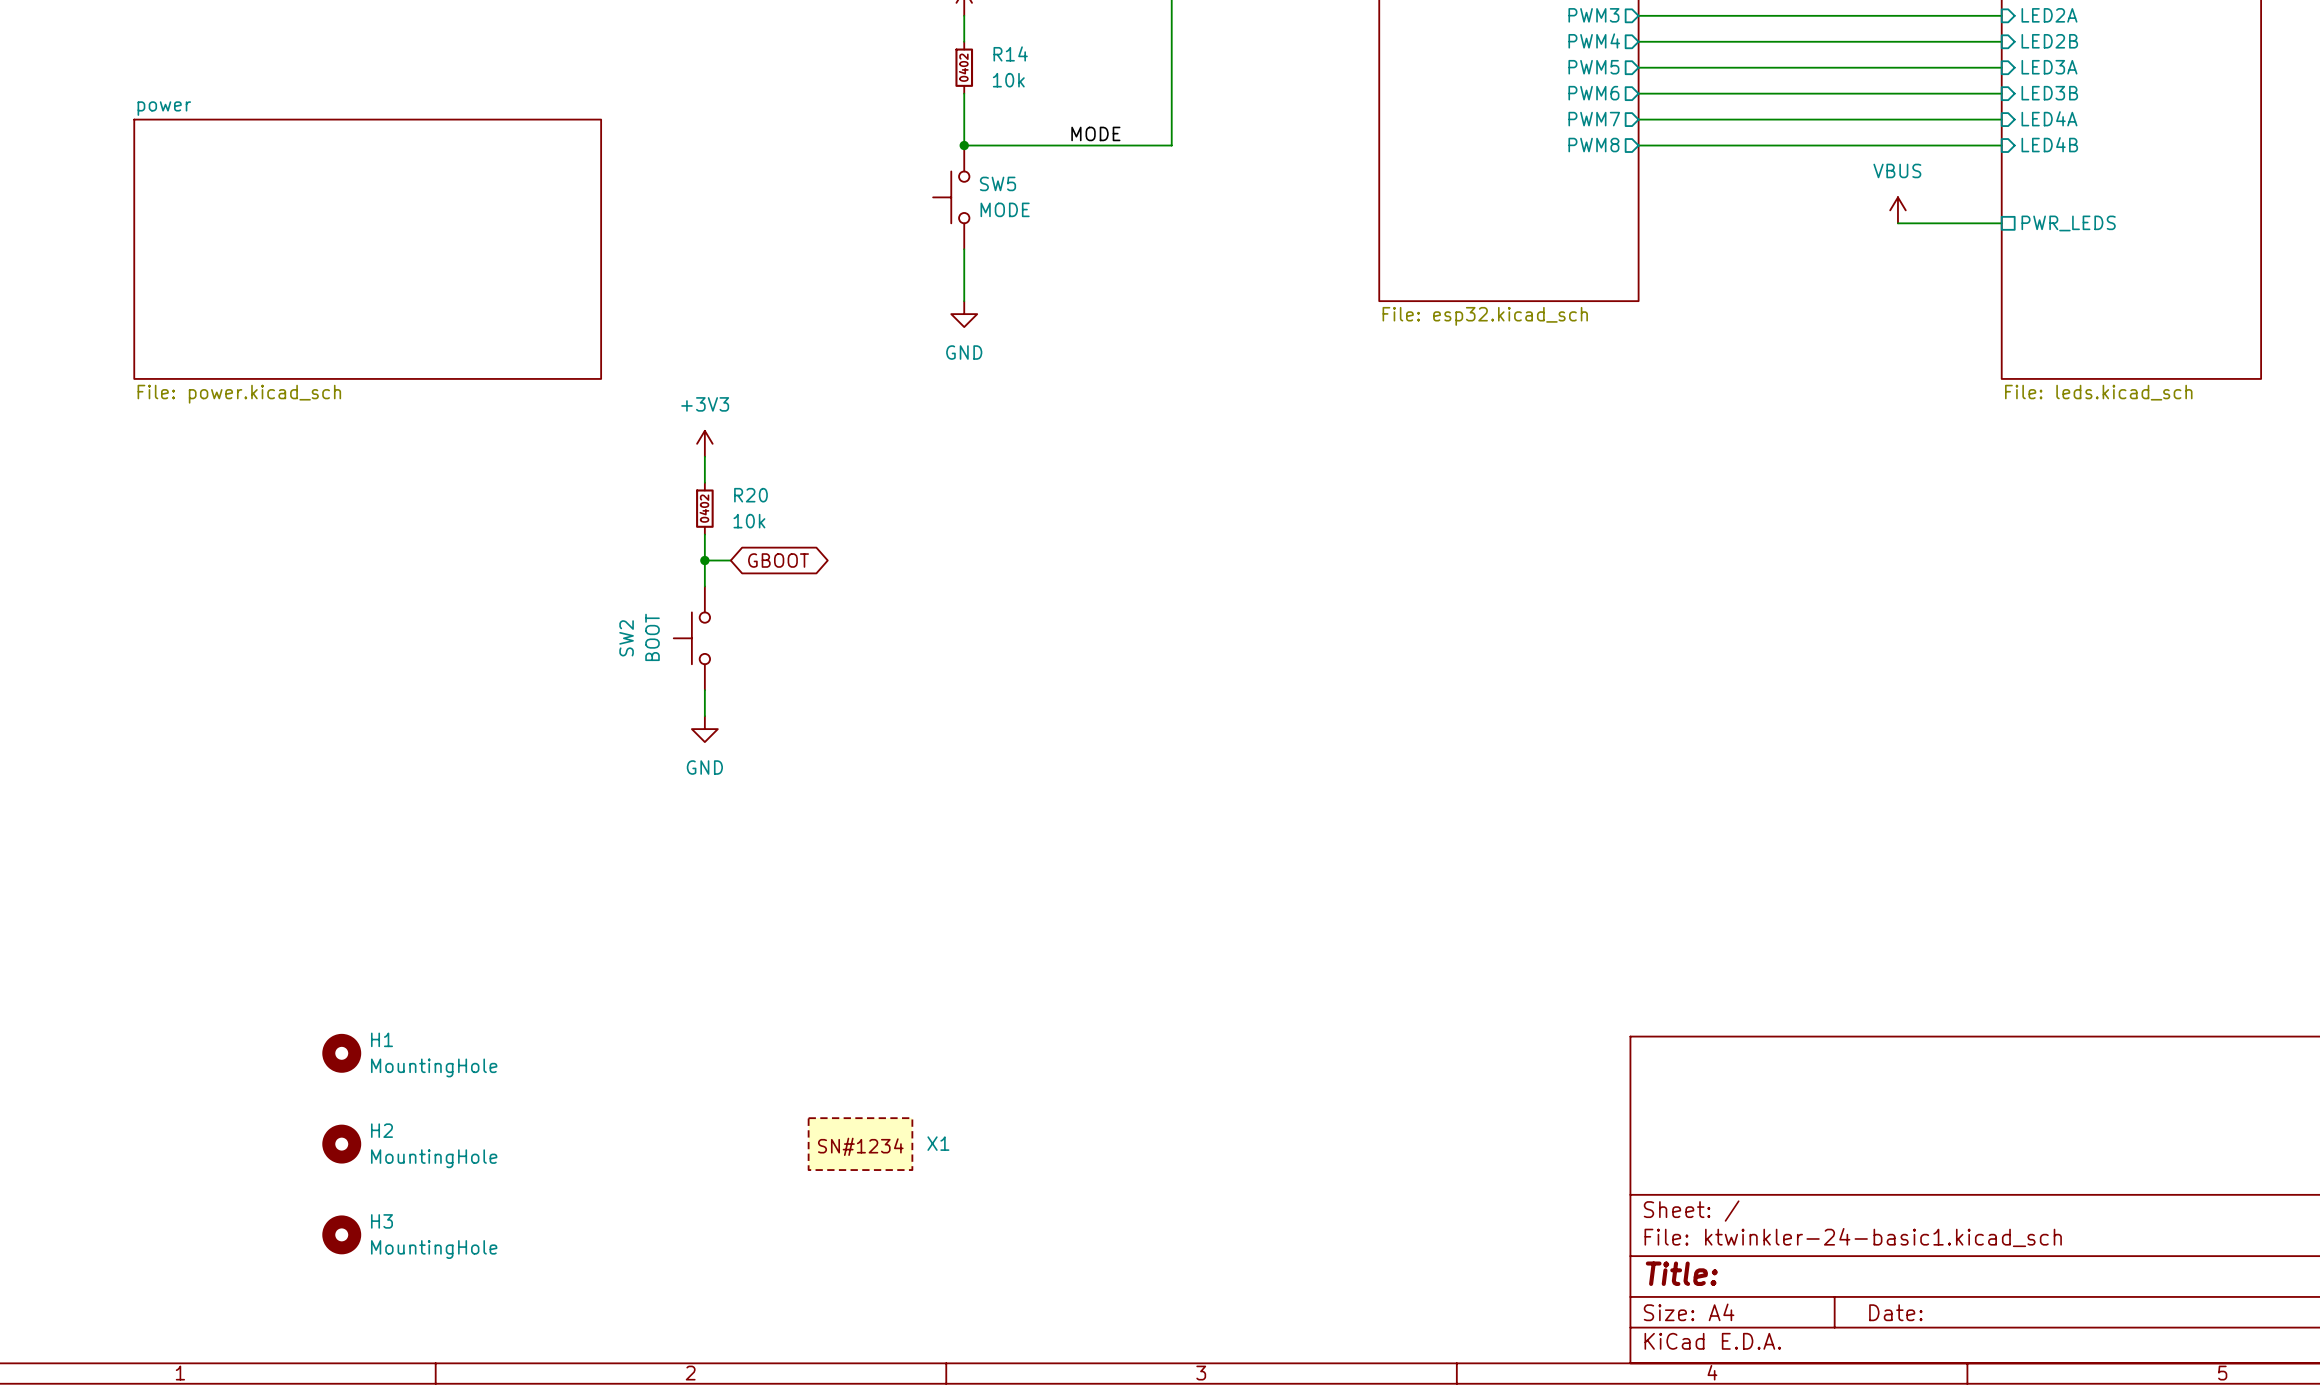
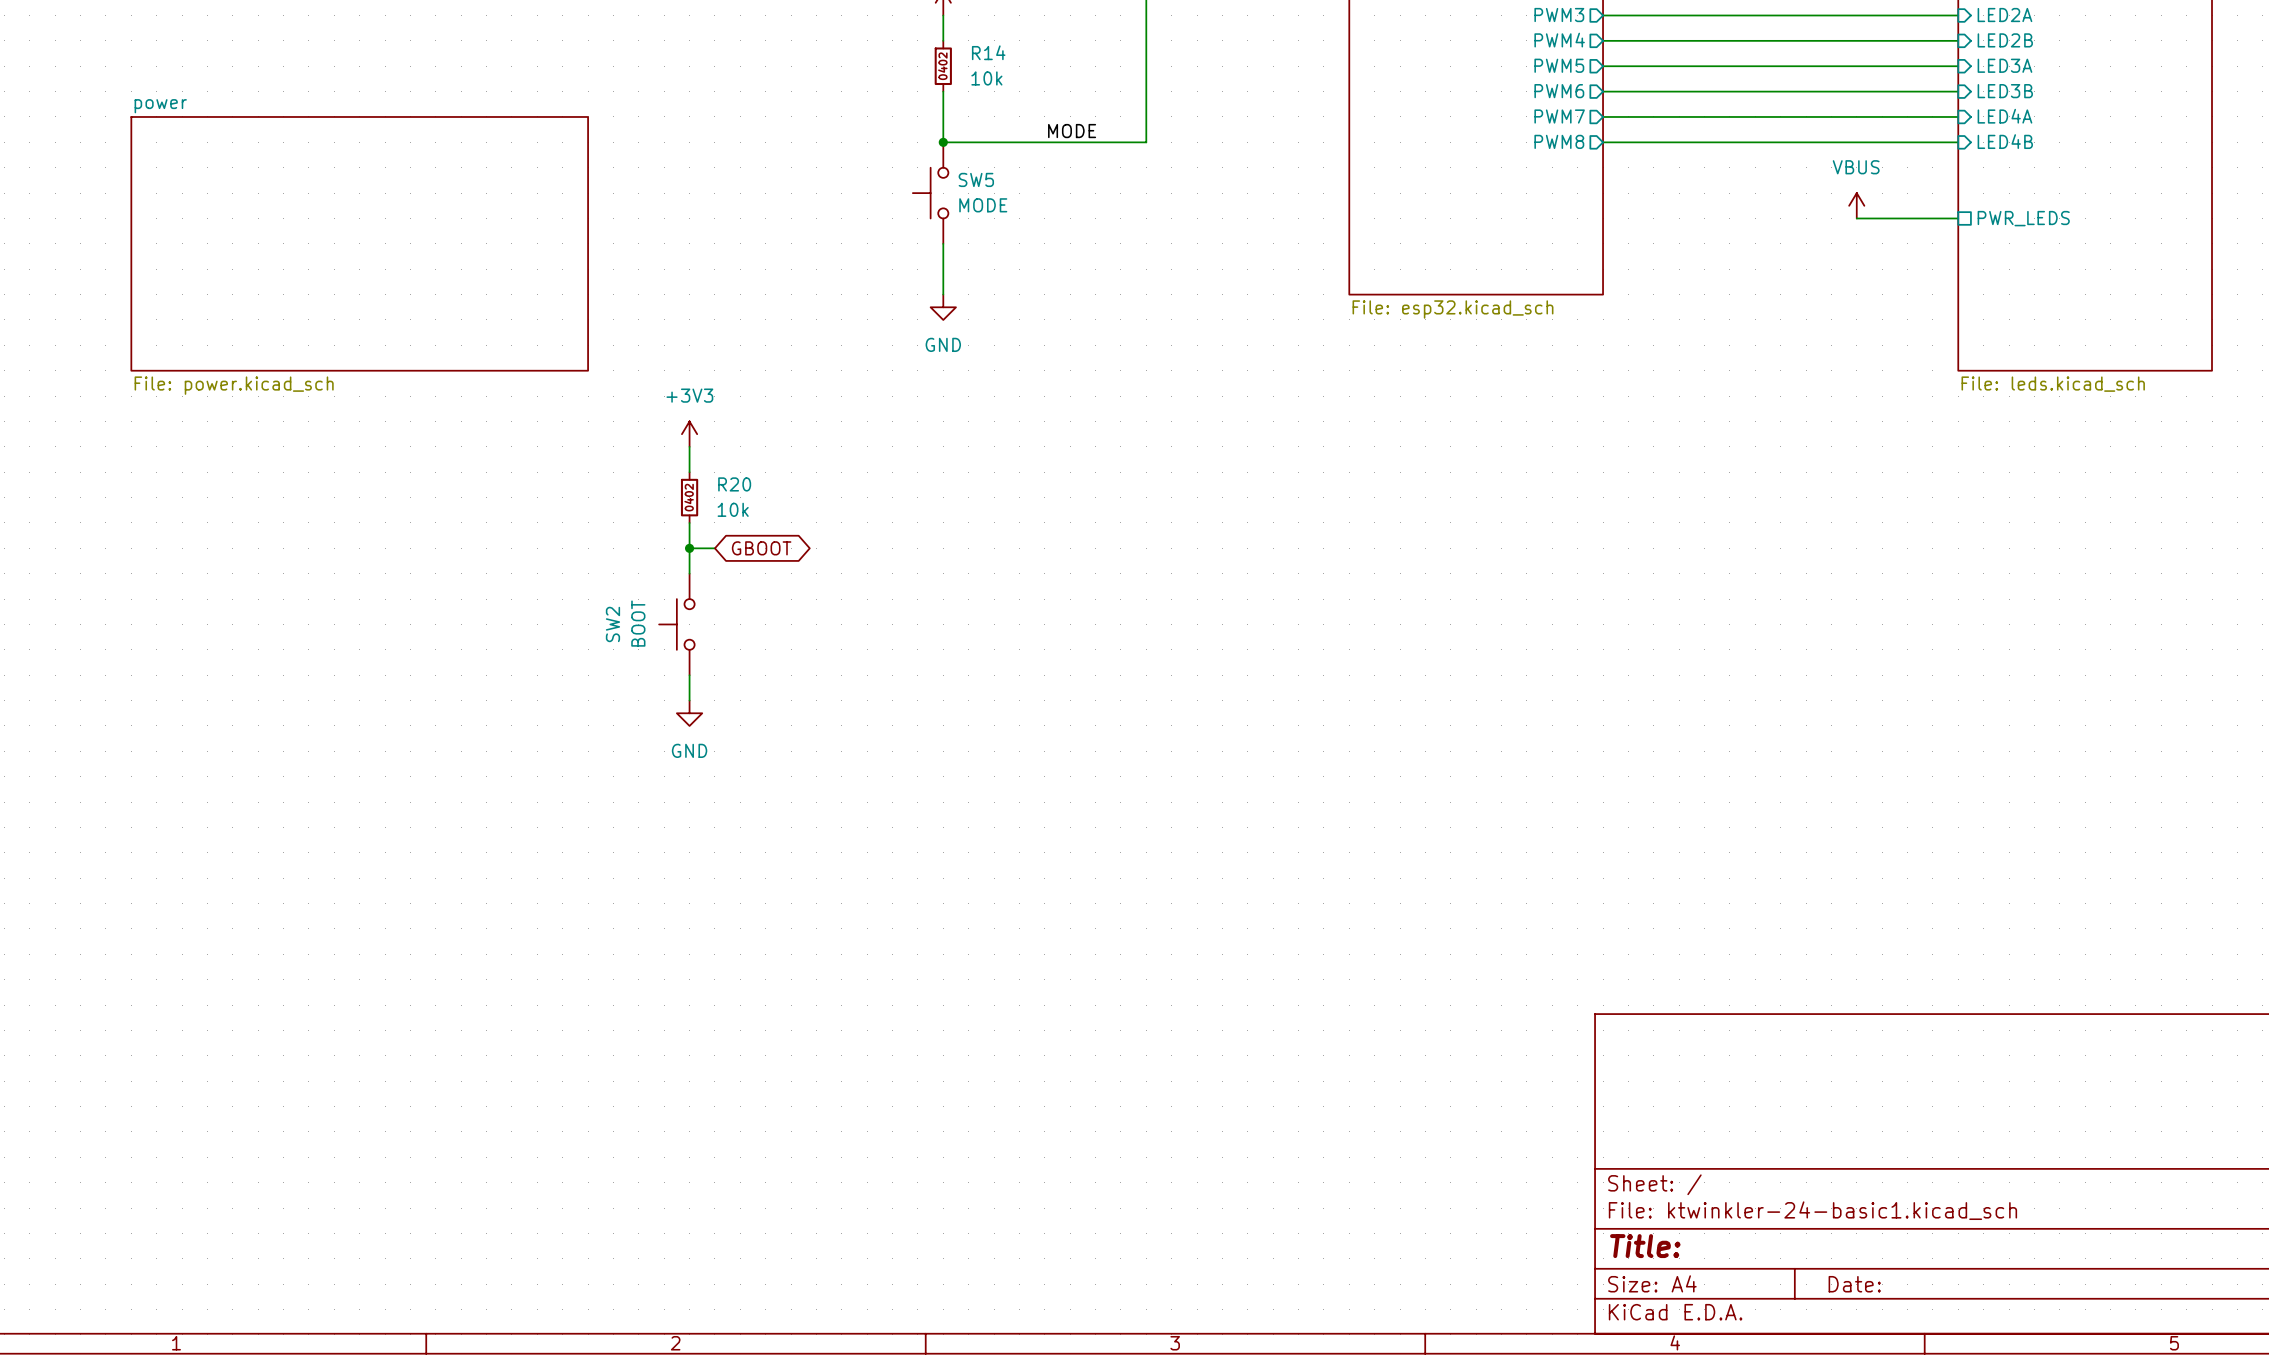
H1: MountingHole (341, 1053) -> none
H2: MountingHole (341, 1144) -> none
X1: (860, 1144) -> none
H3: MountingHole (341, 1234) -> none

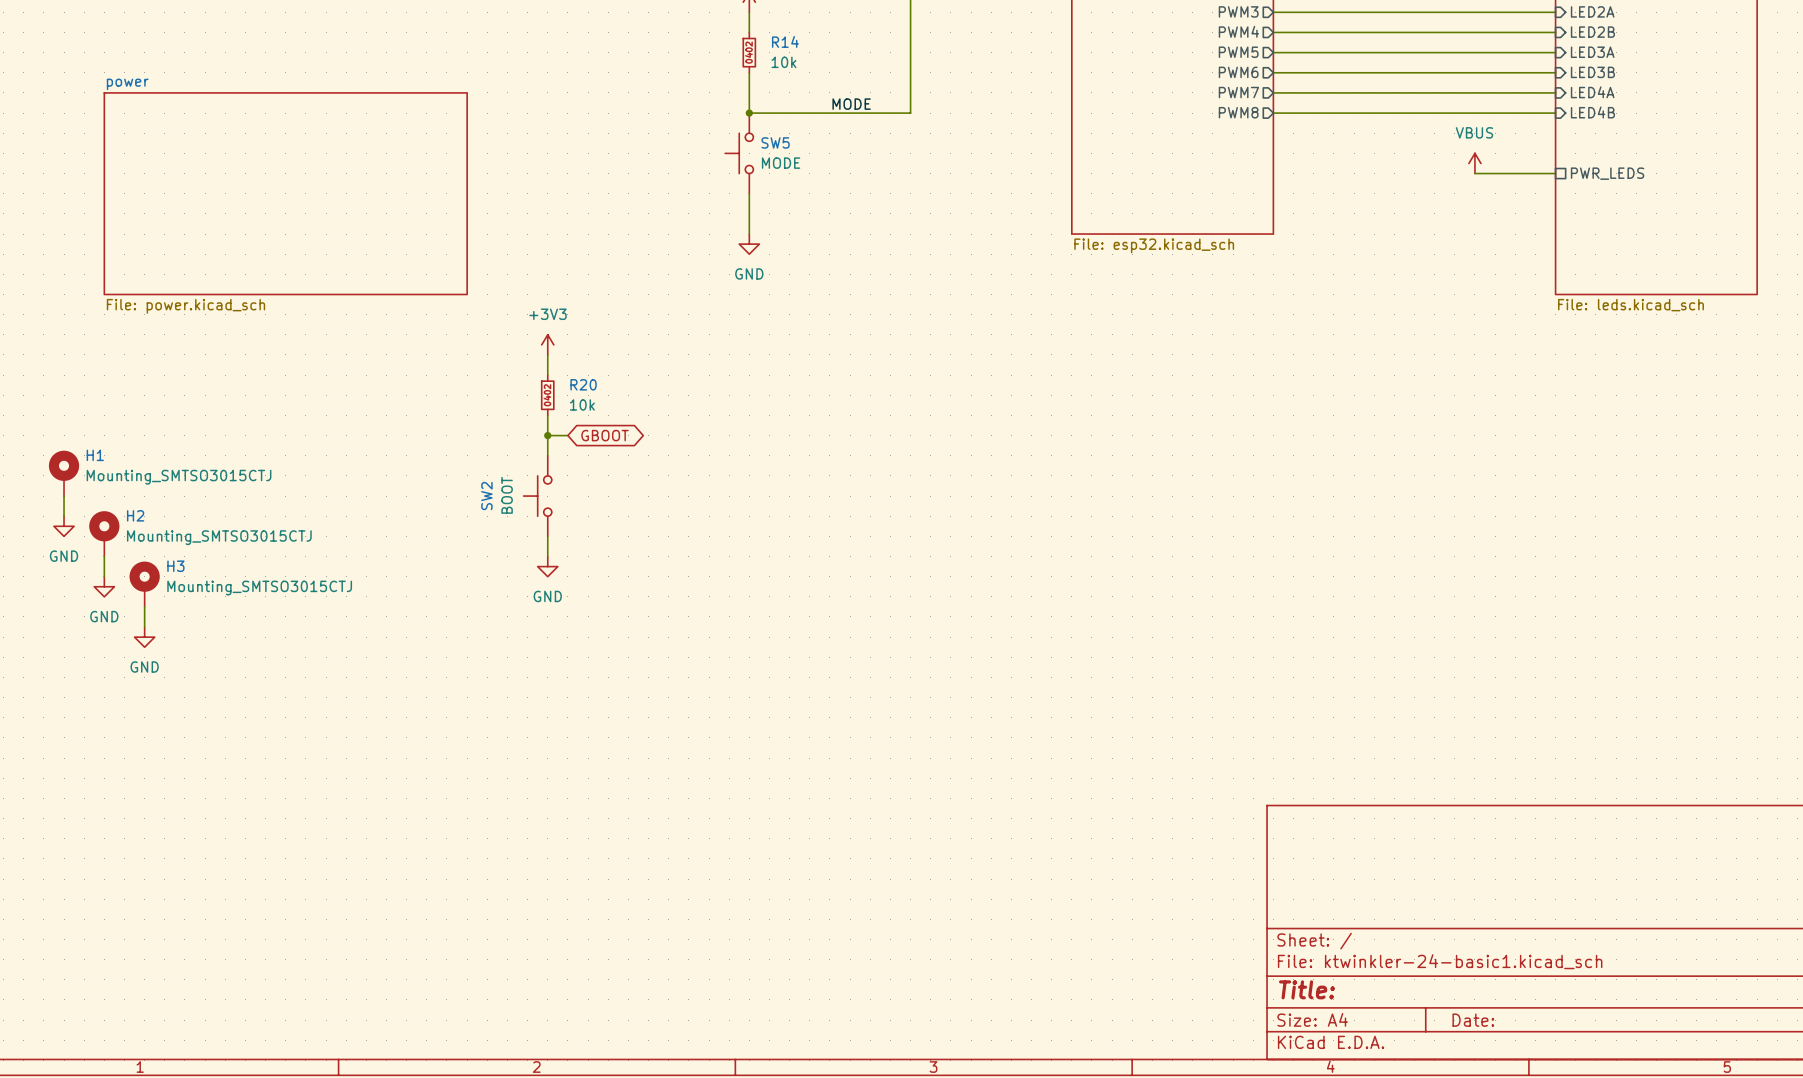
H1: none -> Mounting_SMTSO3015CTJ (64, 473)
wire: none -> (64, 496) (64, 516)
power symbol: none -> GND (64, 526)
H2: none -> Mounting_SMTSO3015CTJ (104, 533)
wire: none -> (104, 556) (104, 576)
H3: none -> Mounting_SMTSO3015CTJ (144, 584)
power symbol: none -> GND (104, 586)
wire: none -> (144, 606) (144, 627)
power symbol: none -> GND (144, 637)

